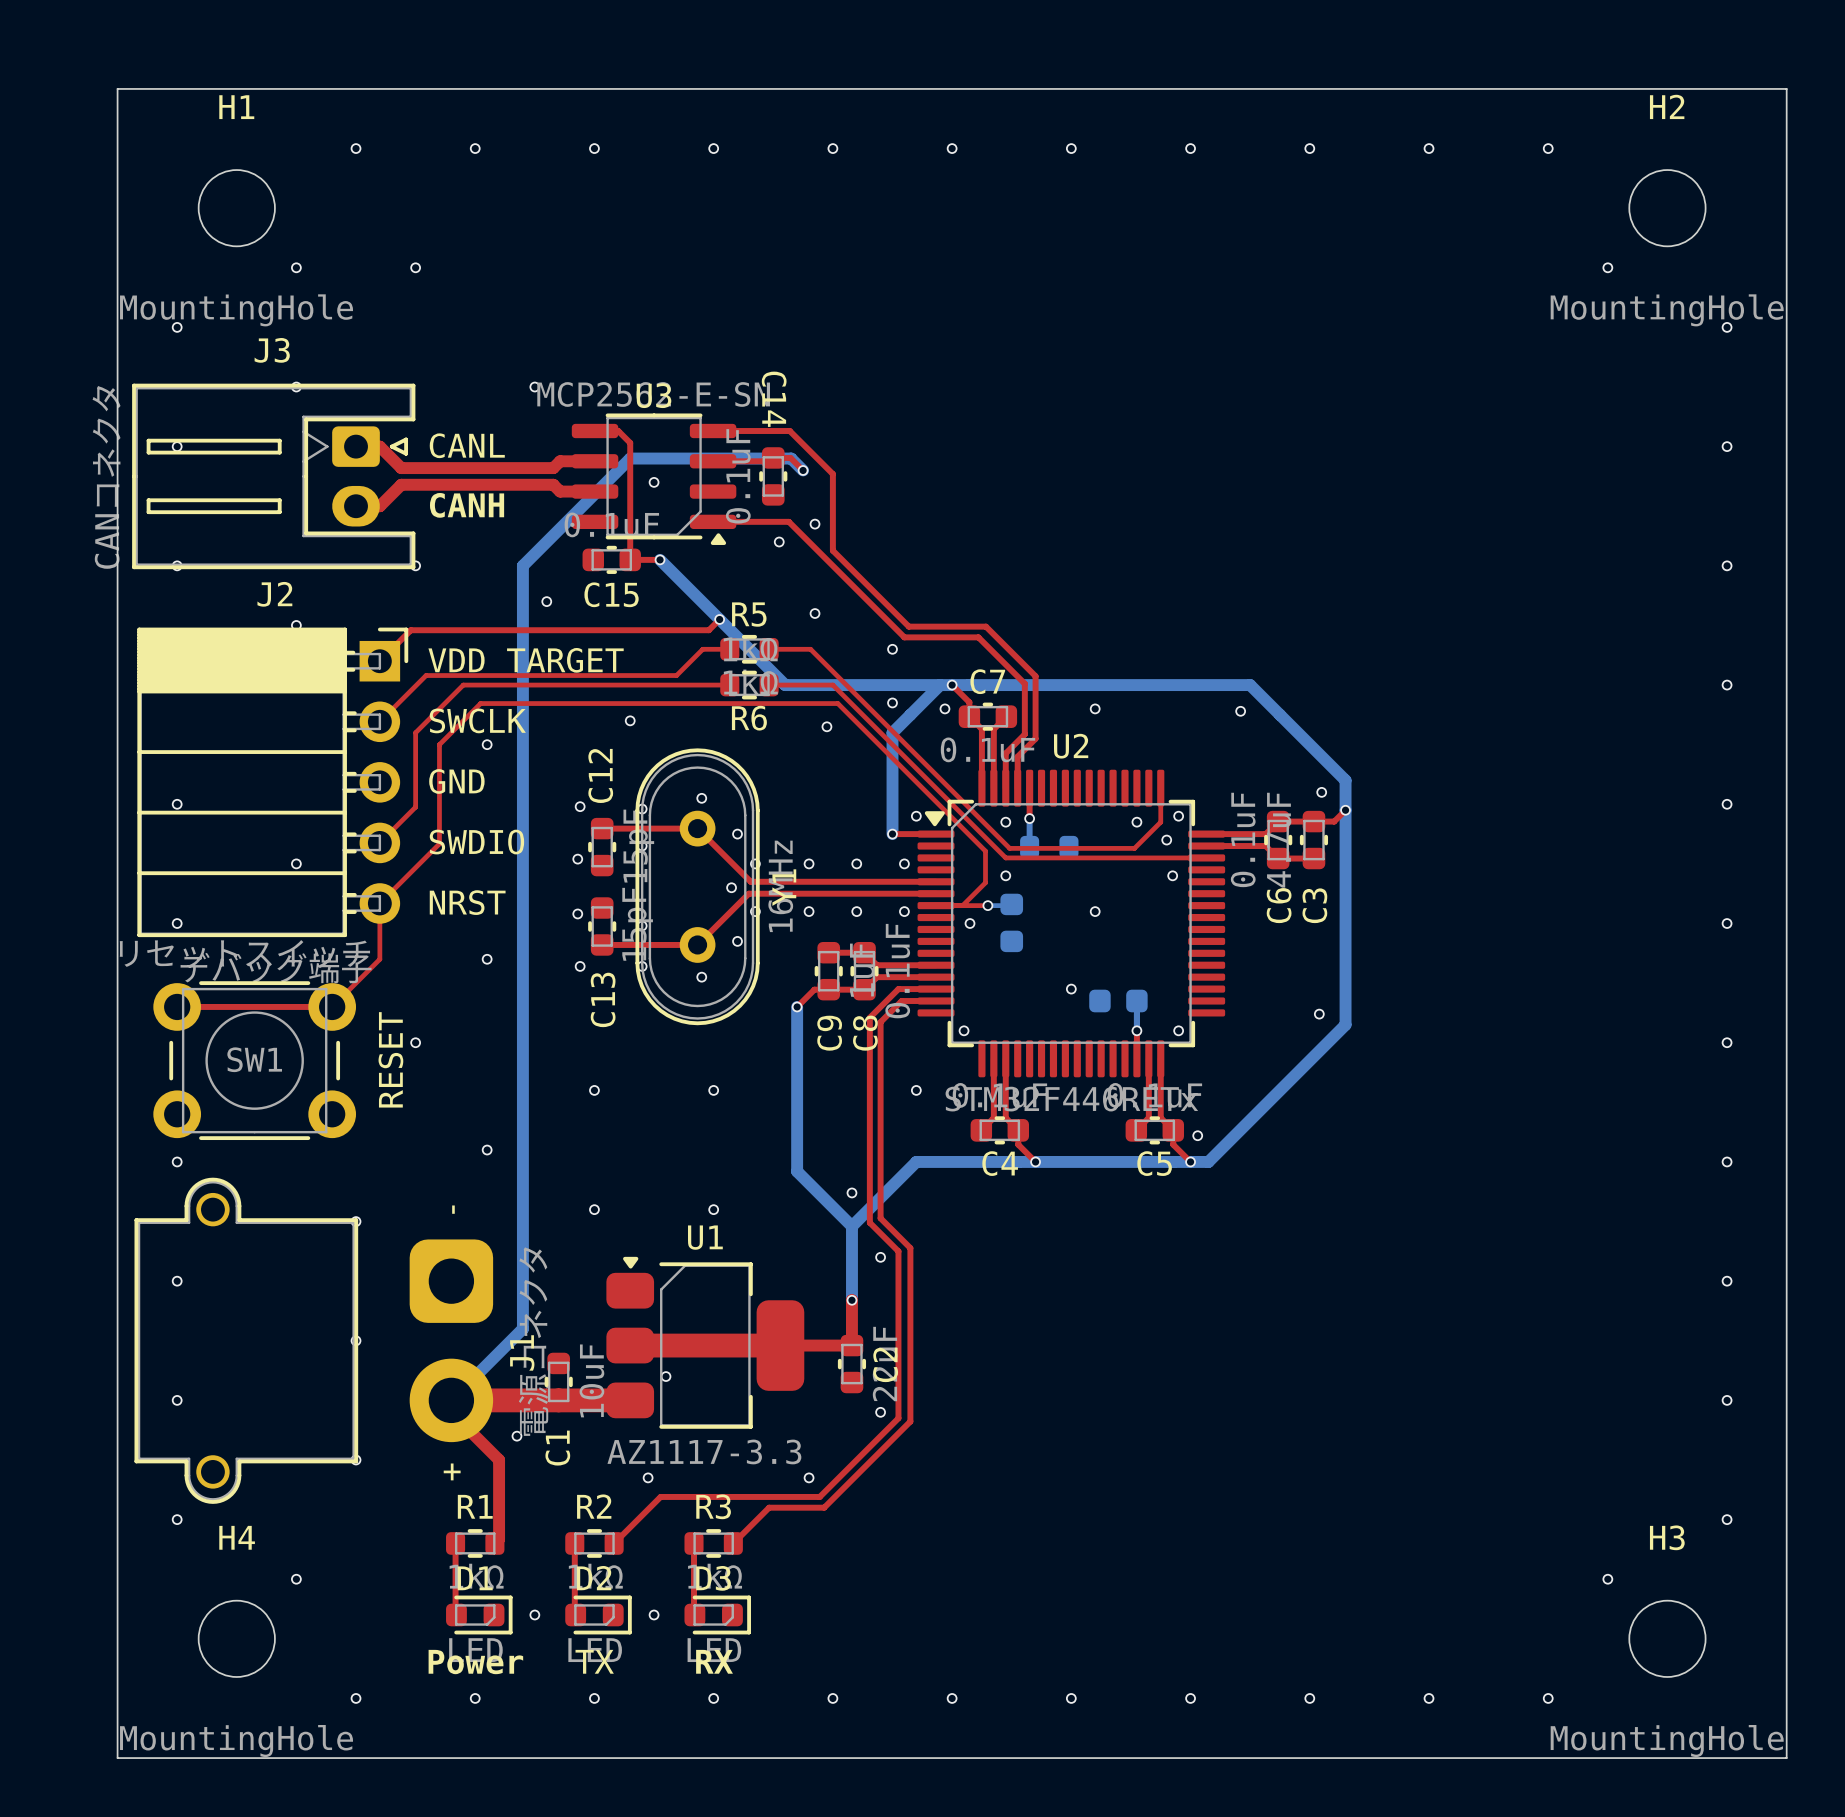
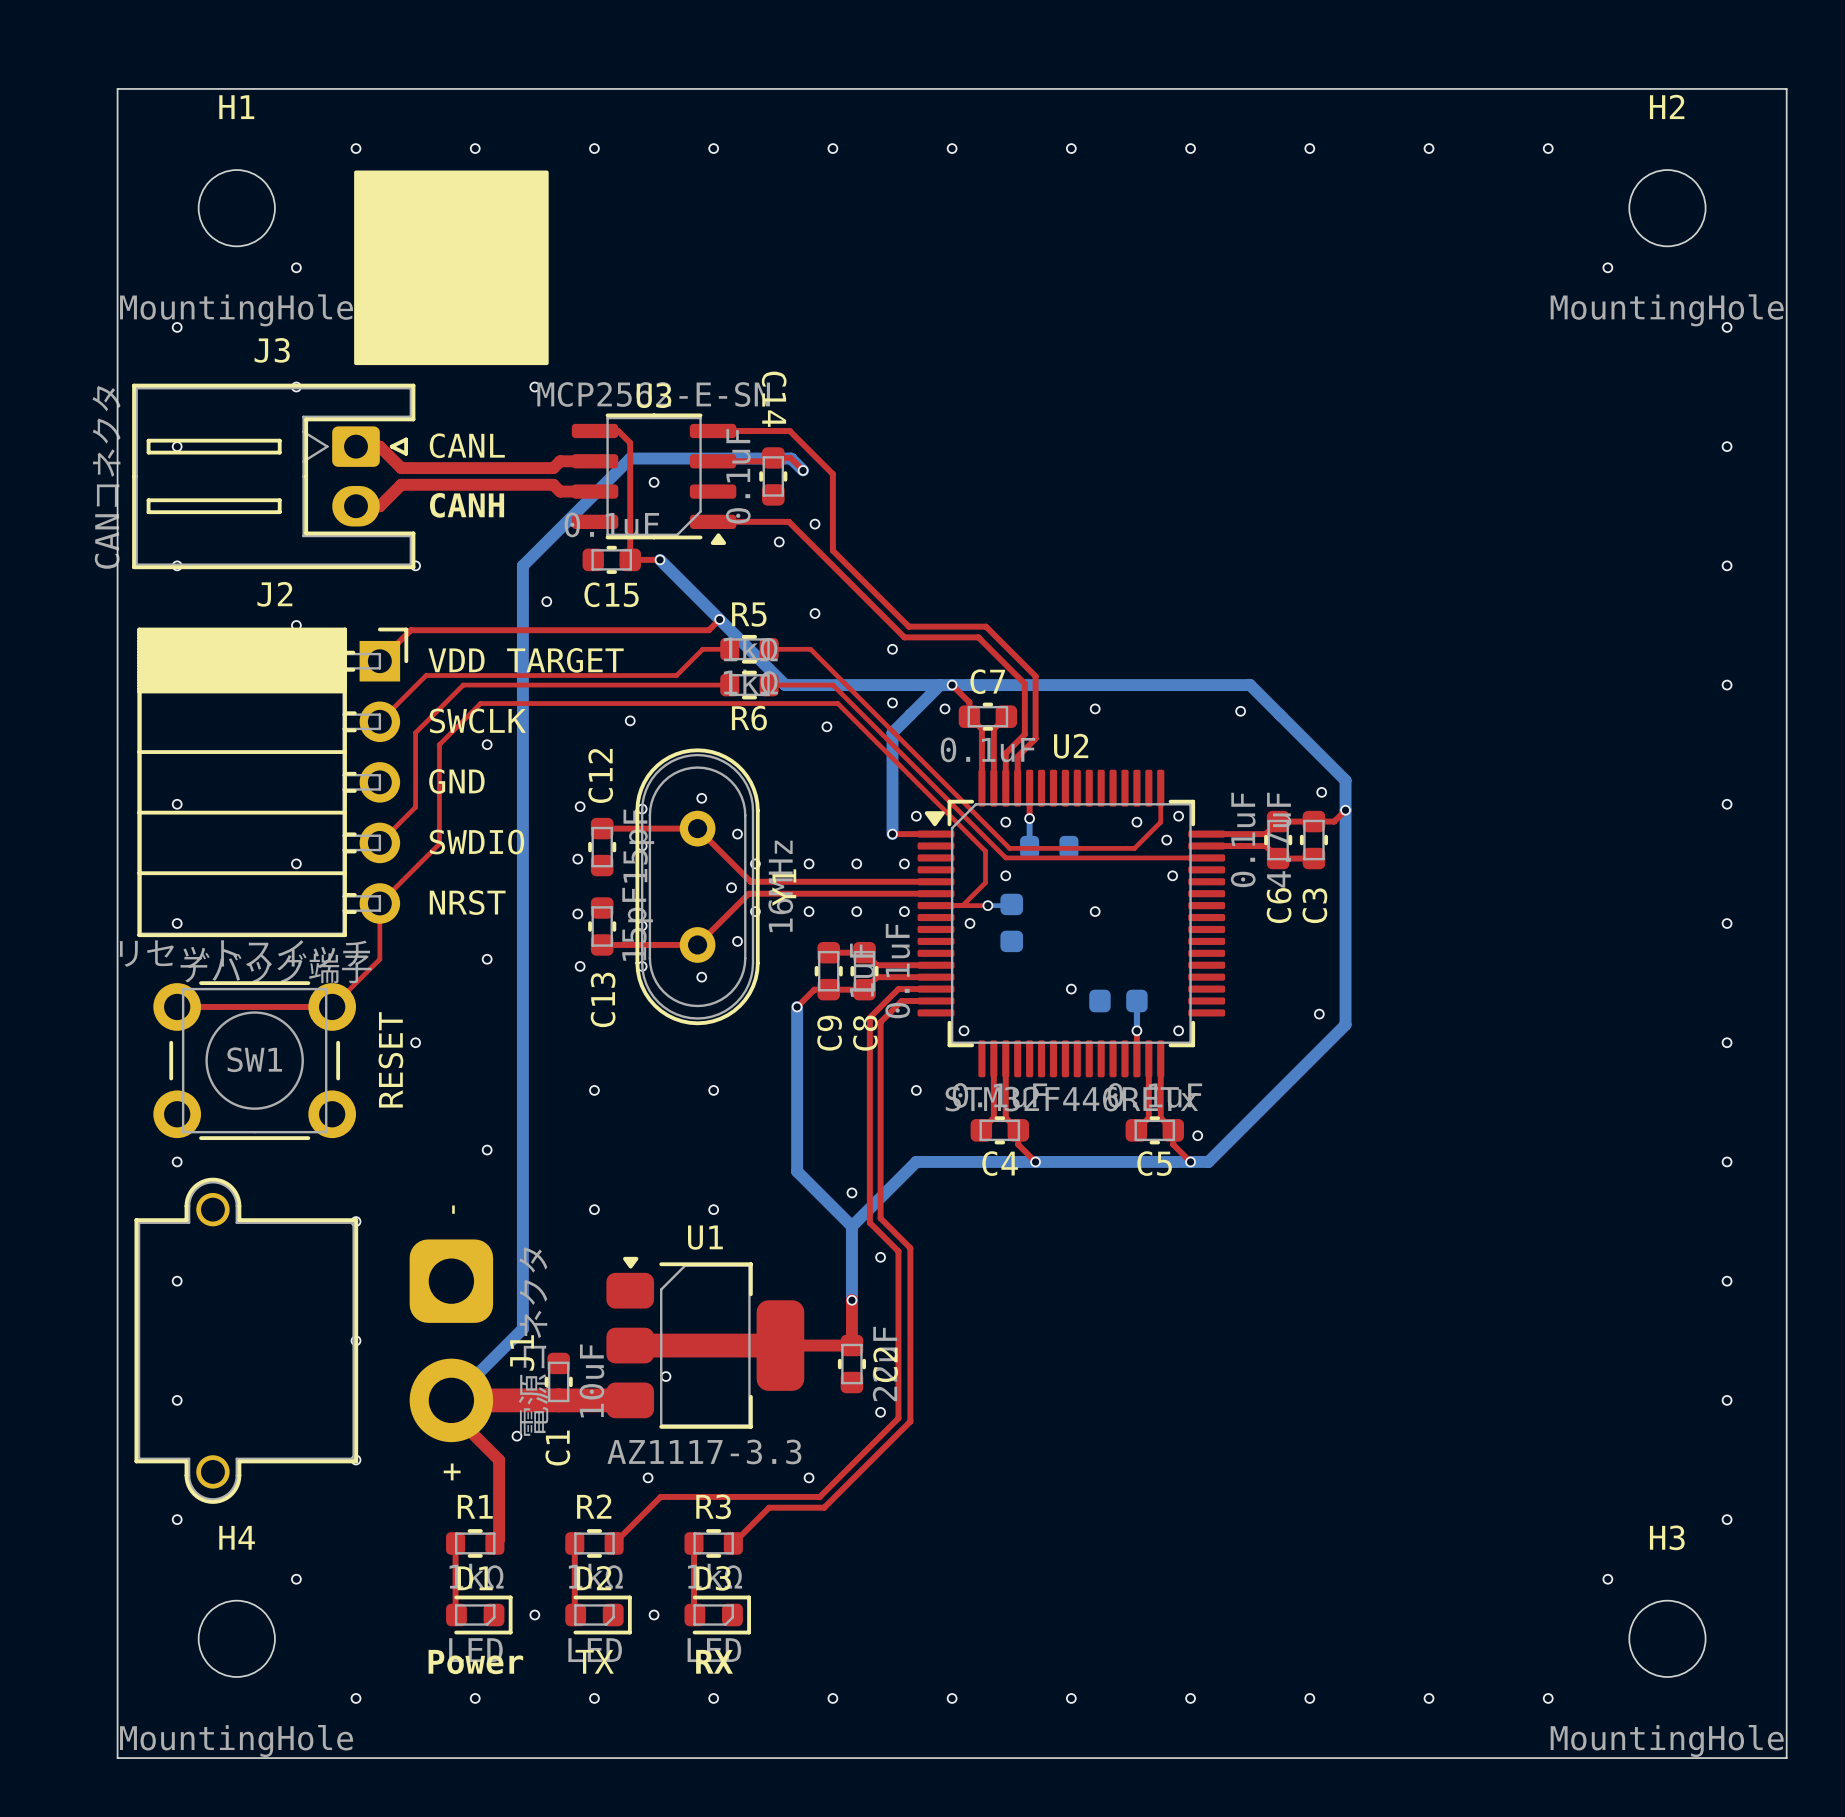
drawing: none -> [354, 170, 549, 366]
via: (415, 267) -> none

